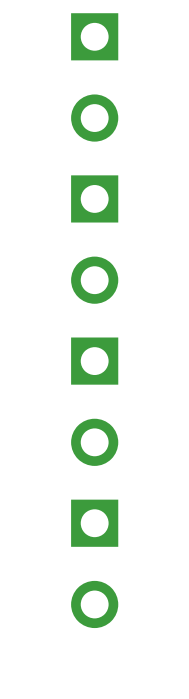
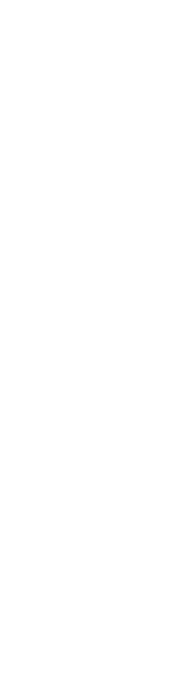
part: (94, 77) -> none
part: (94, 239) -> none
part: (94, 401) -> none
part: (94, 563) -> none

